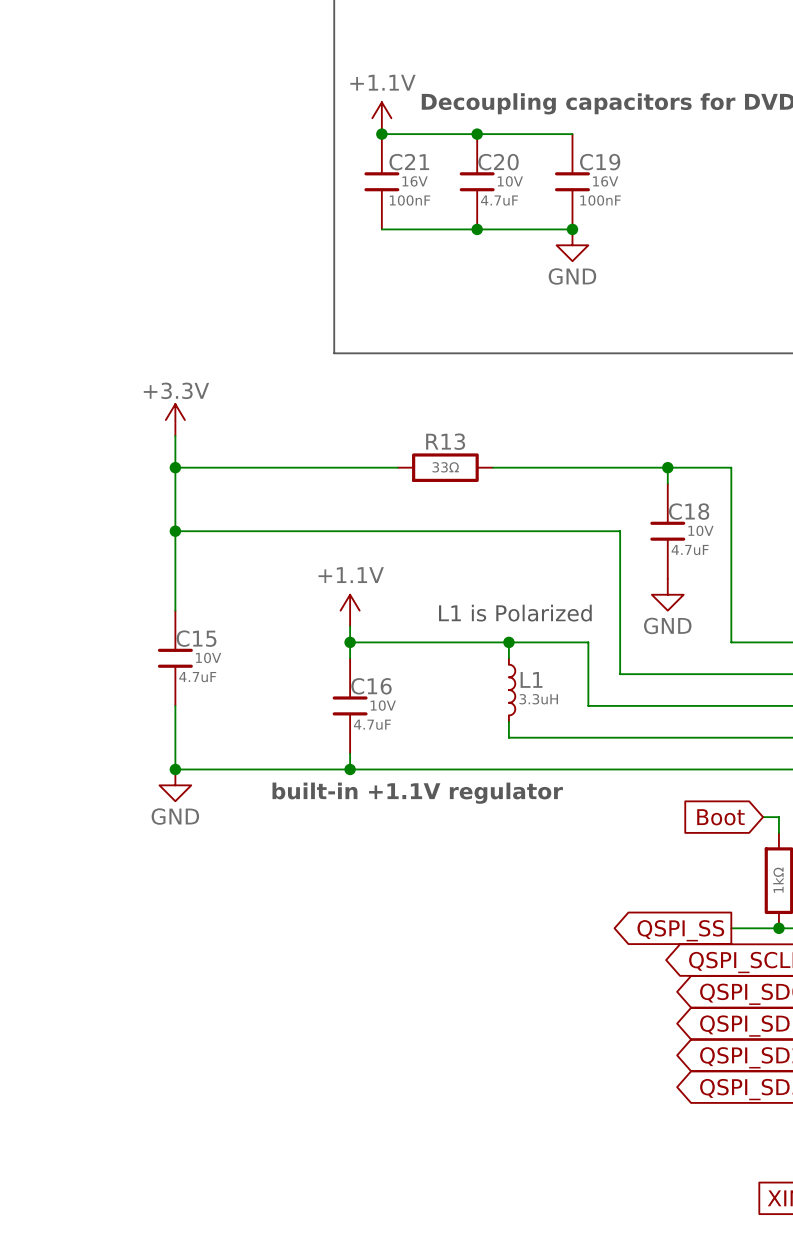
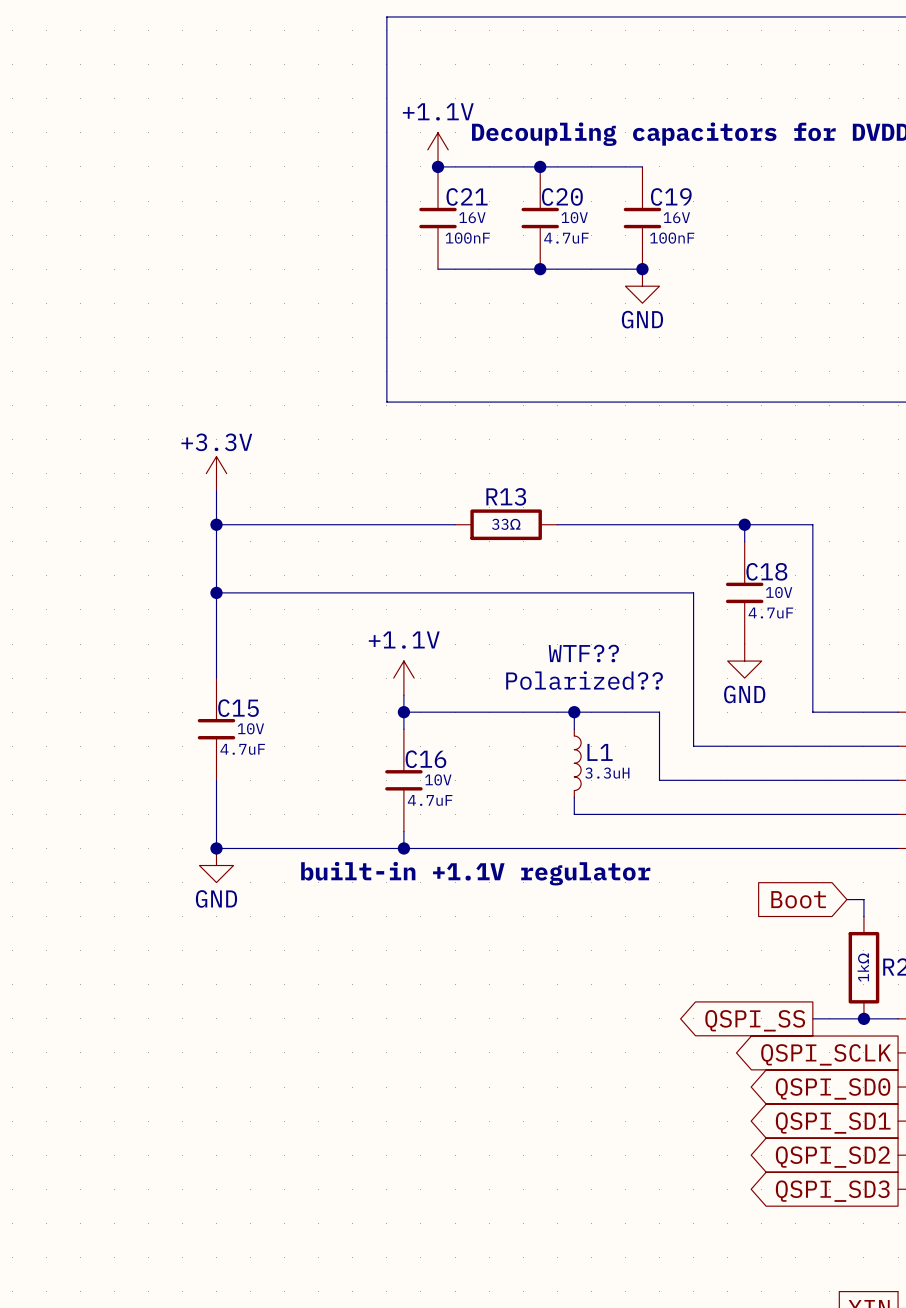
text: none -> WTF?? (583, 653)
text: L1 is Polarized (515, 613) -> Polarized?? (584, 680)

